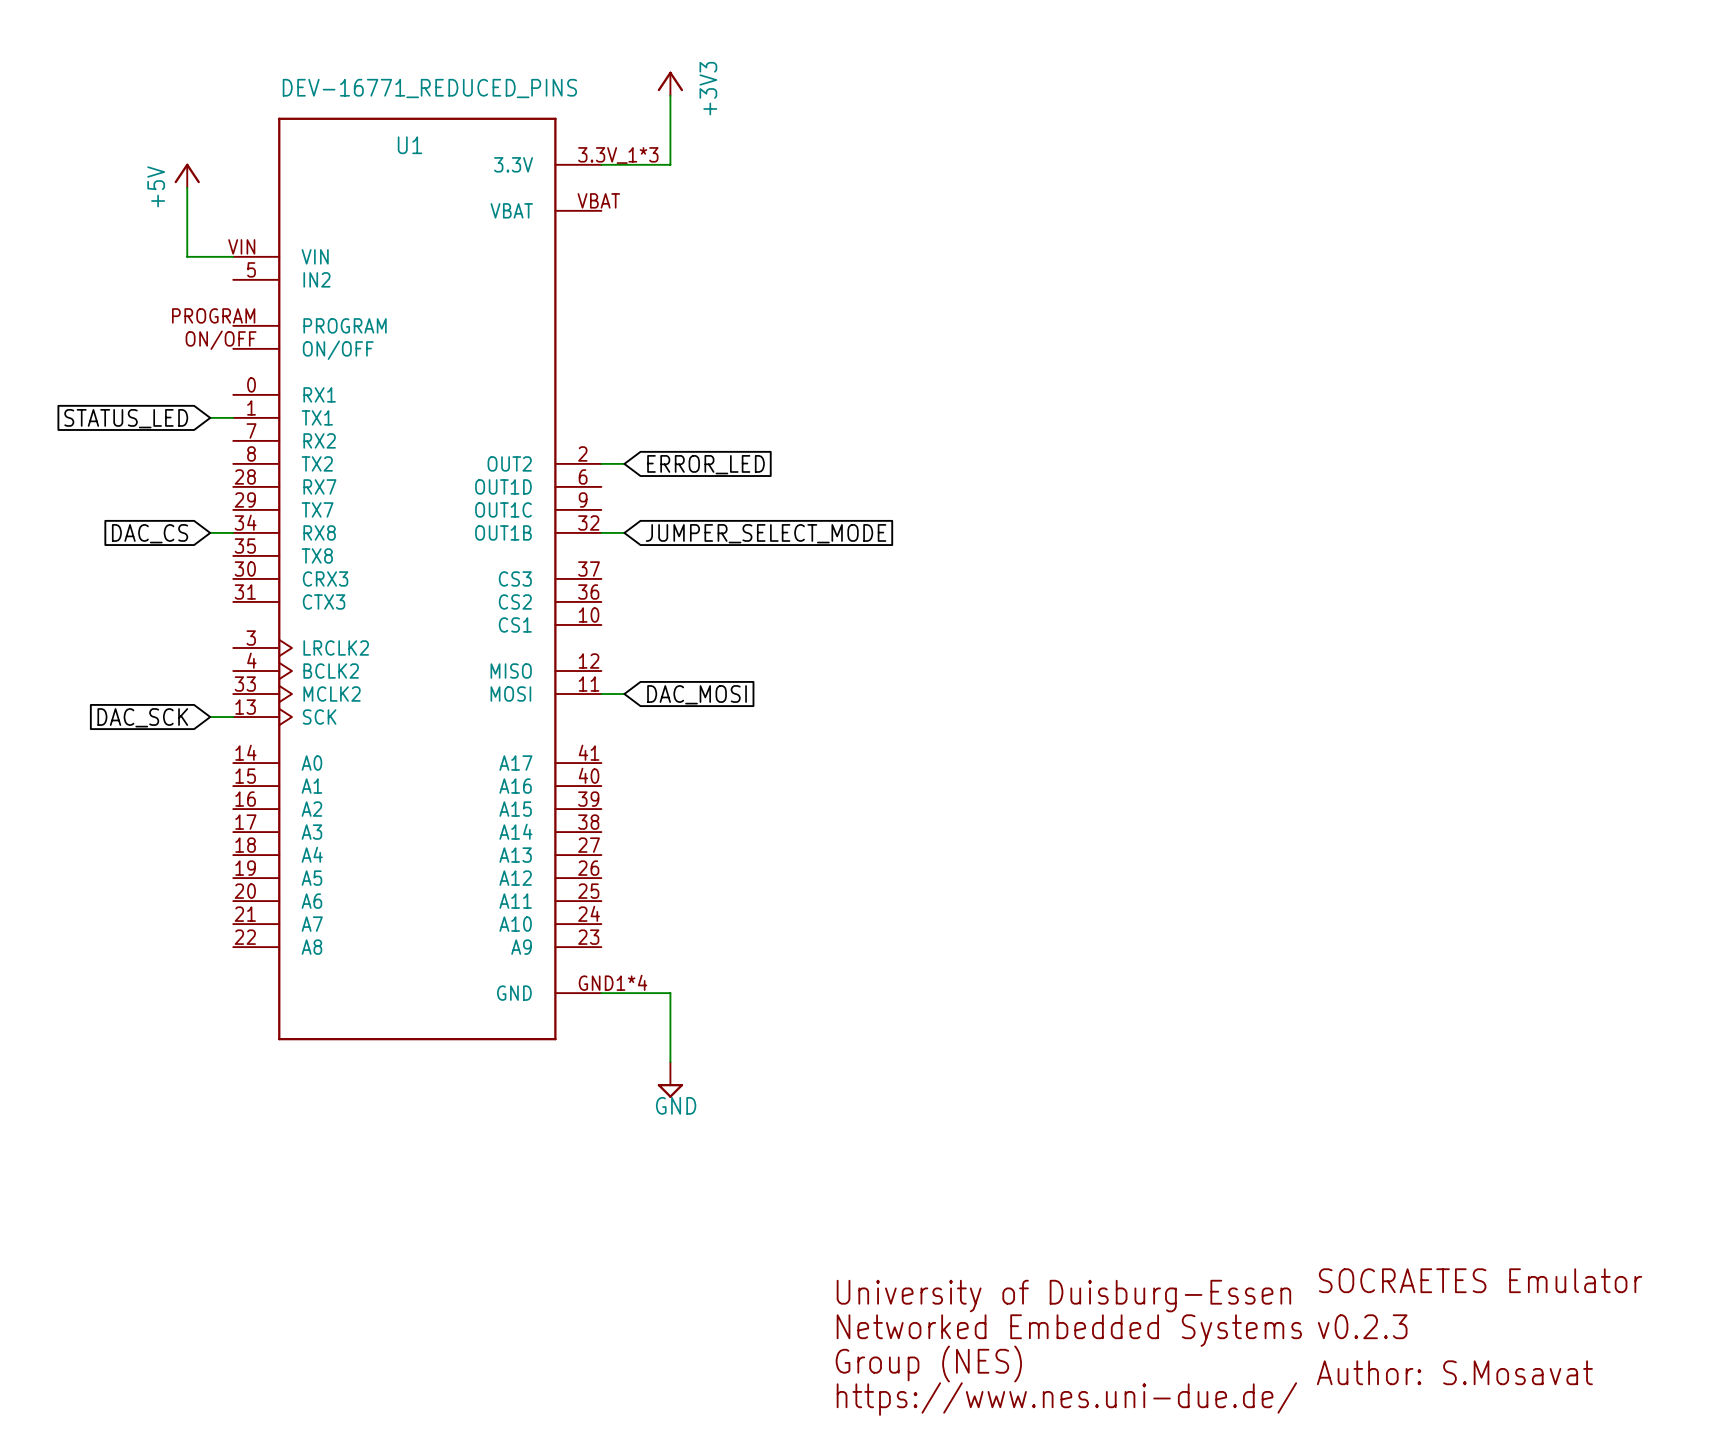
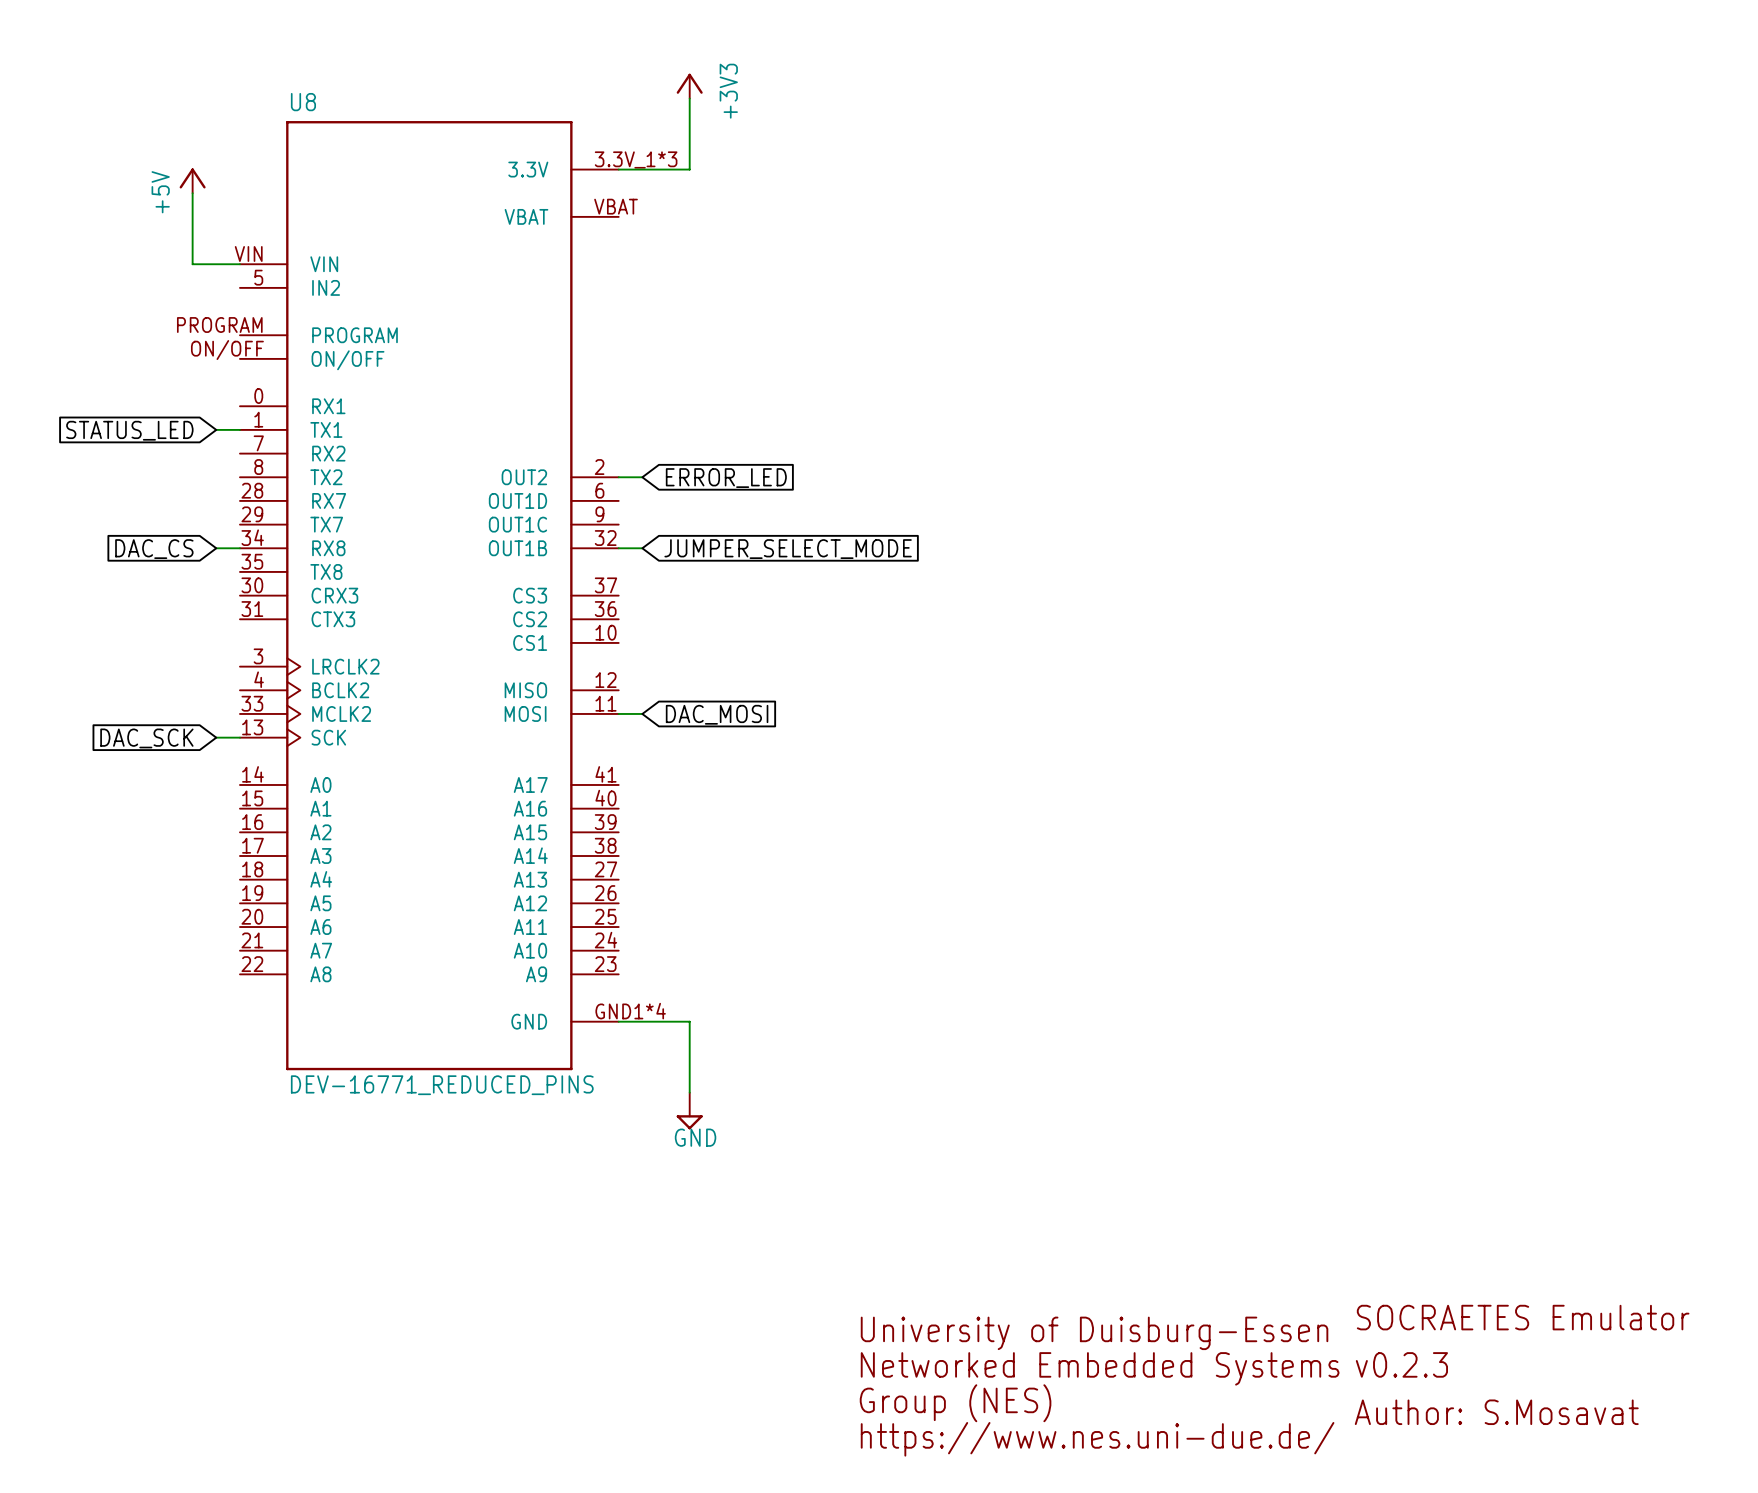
U1 value position: DEV-16771_REDUCED_PINS (429, 88) -> DEV-16771_REDUCED_PINS (442, 1085)
U1 name: U1 (410, 145) -> U8 (303, 102)

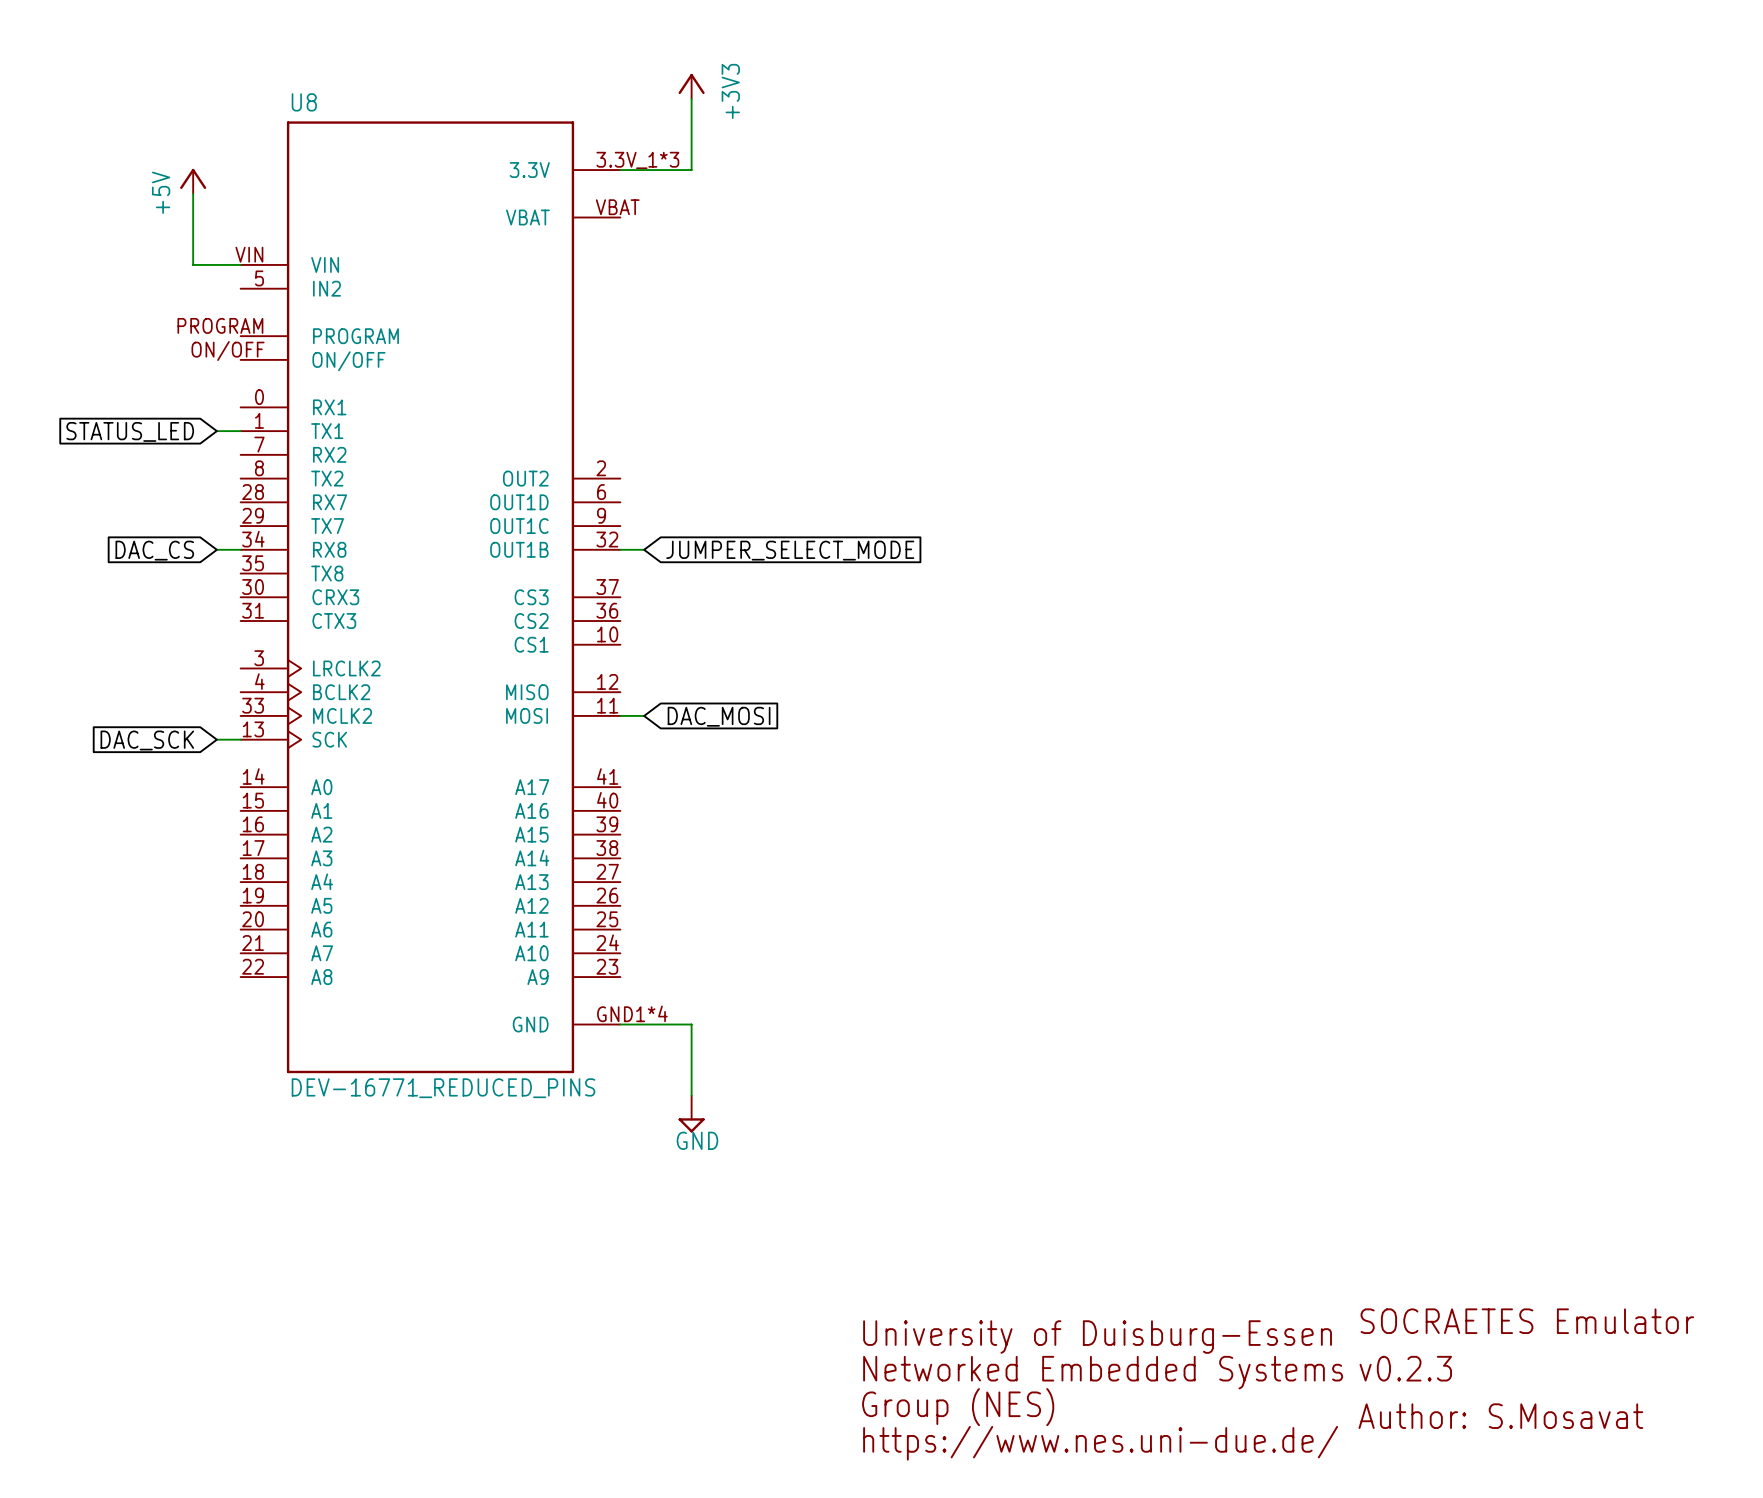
wire: (618, 477) (642, 477) -> none
global label: ERROR_LED (726, 478) -> none

